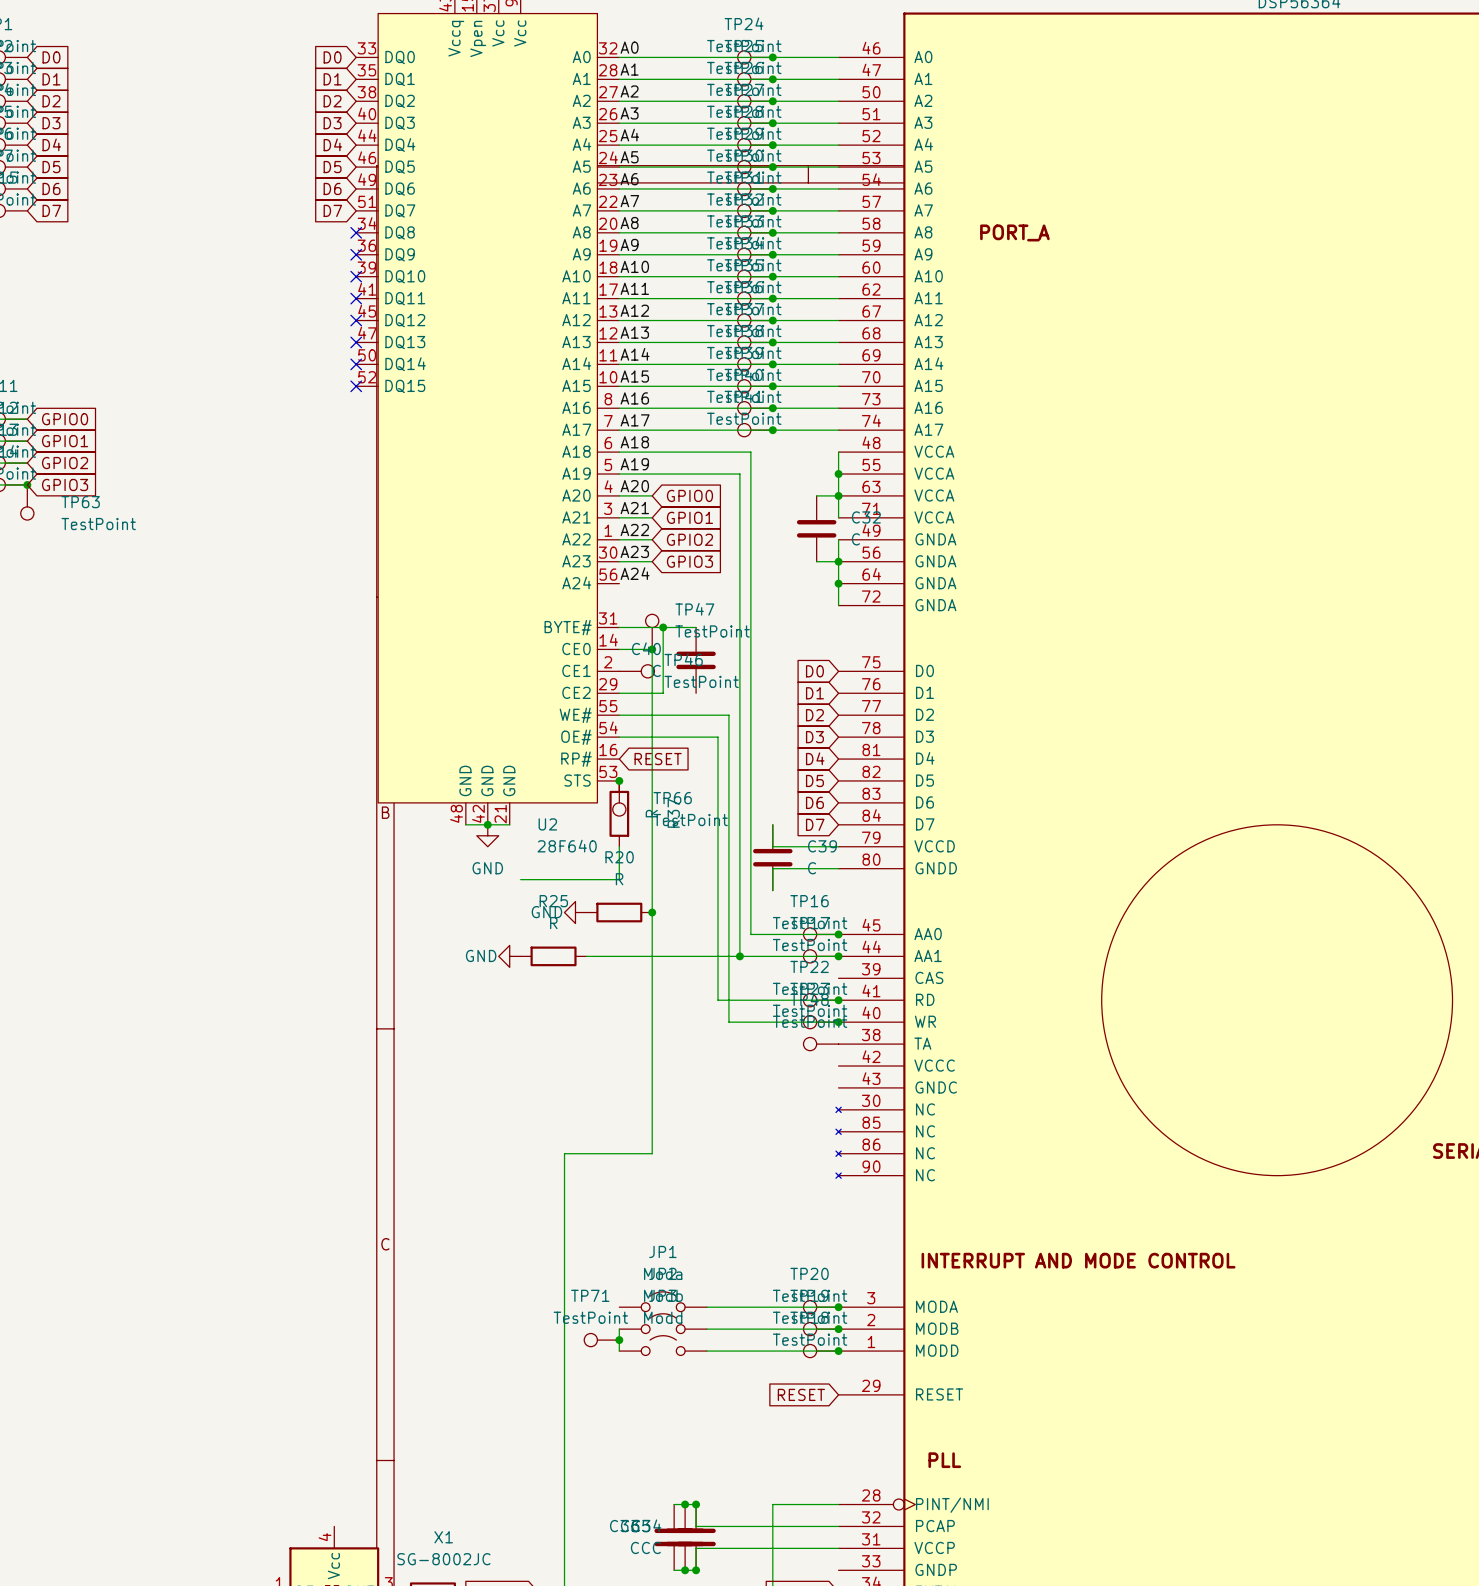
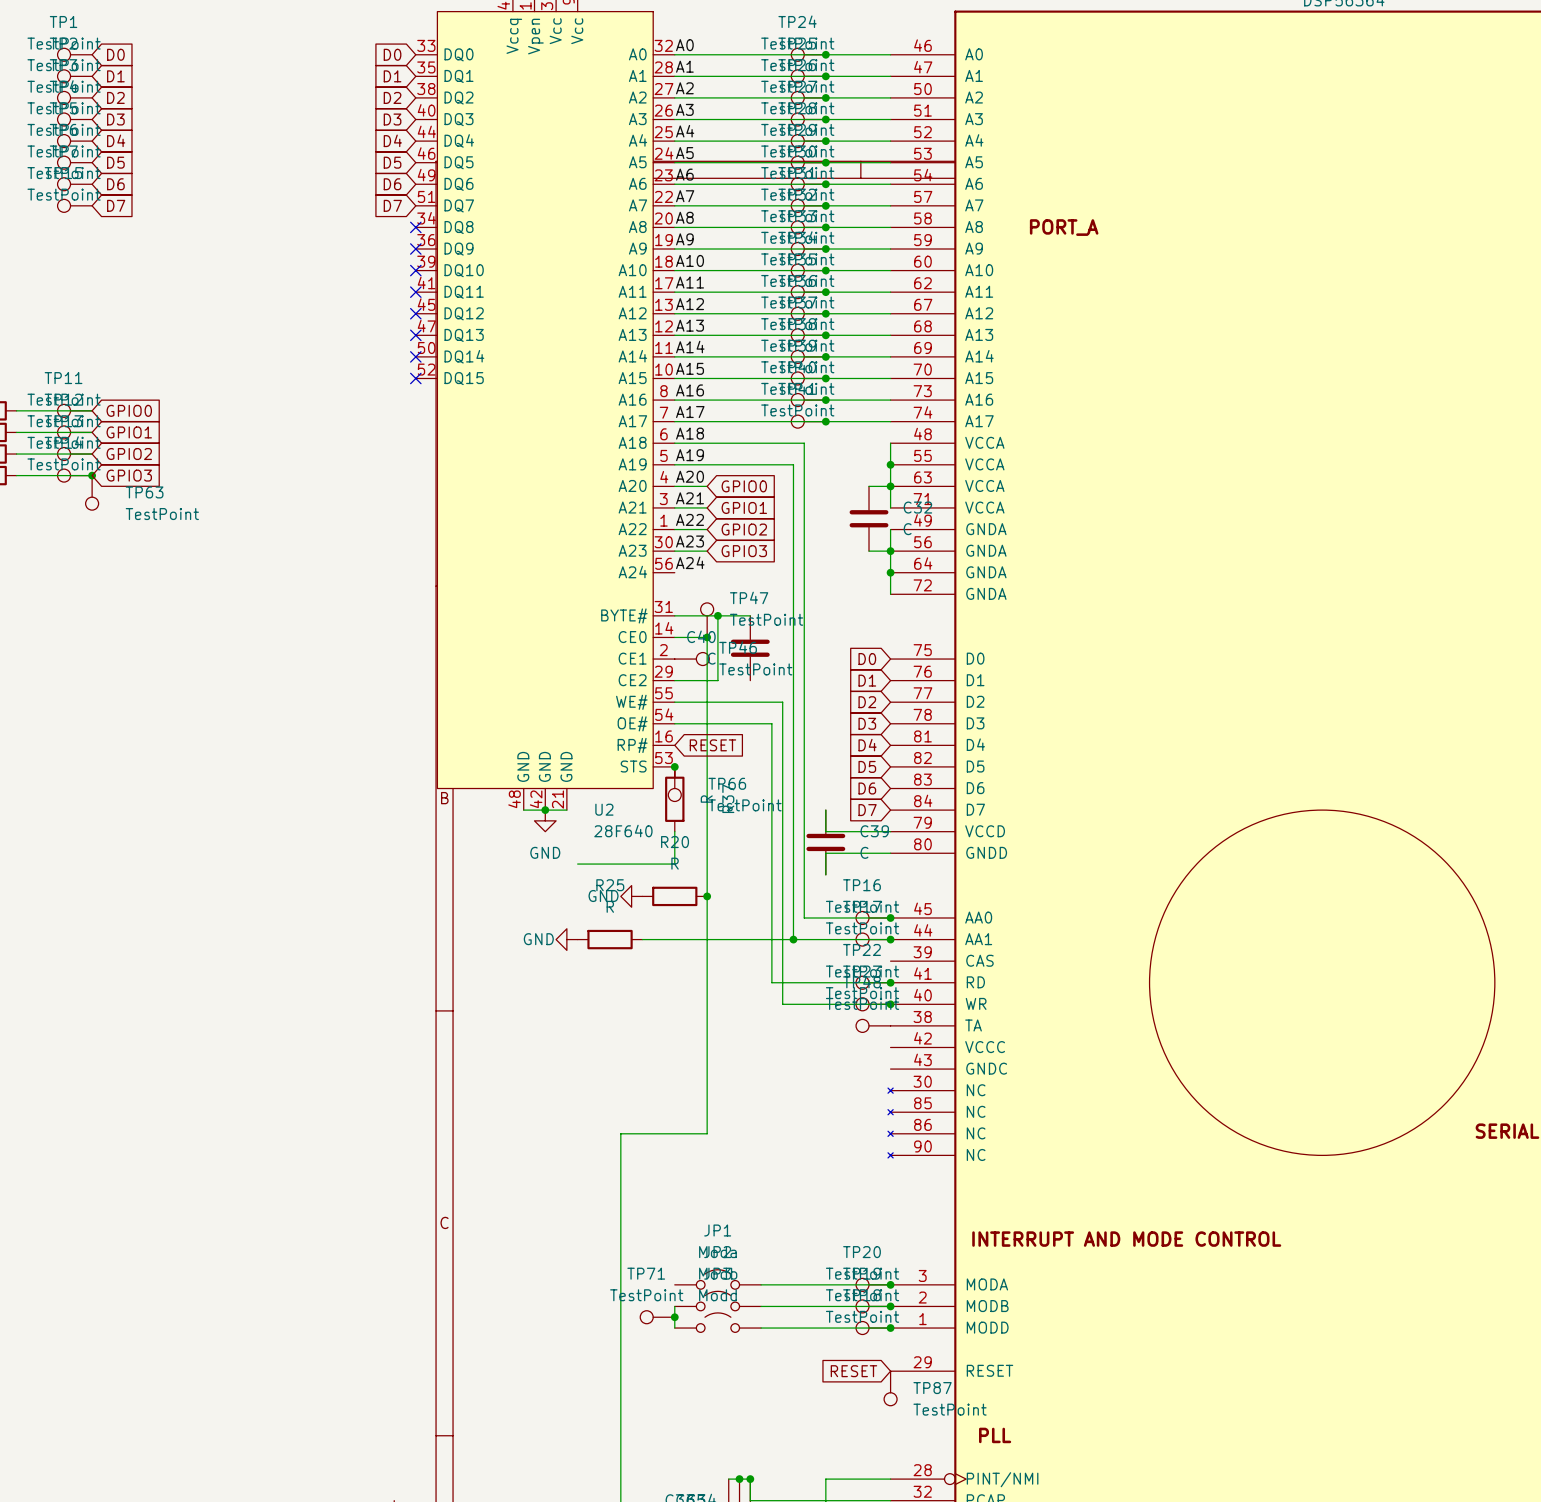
TP87: none -> TestPoint (890, 1388)

